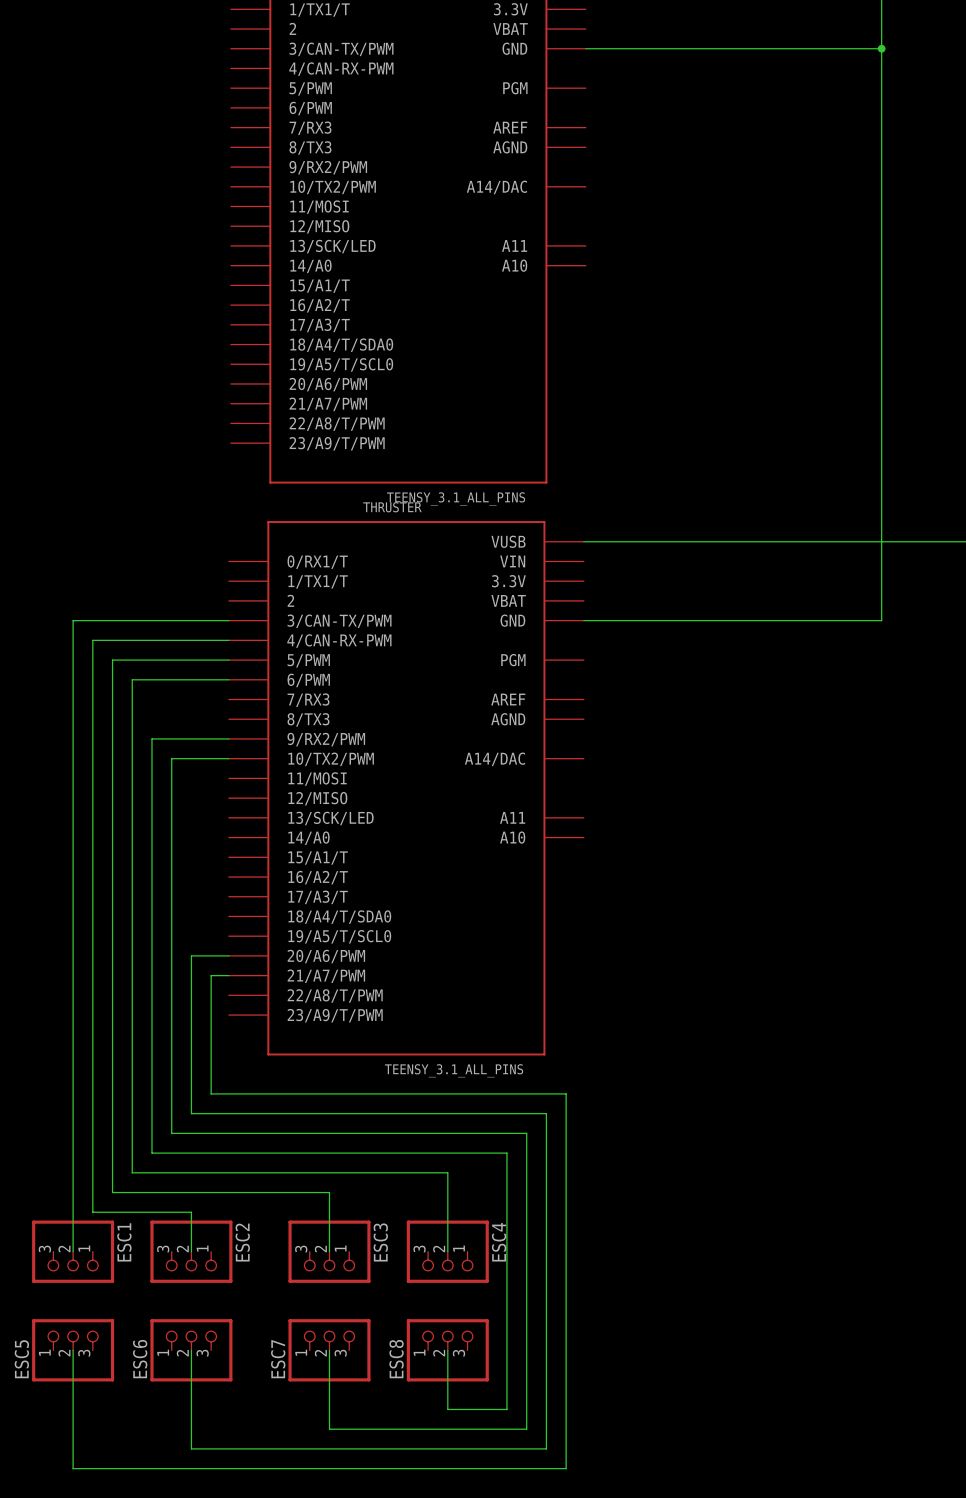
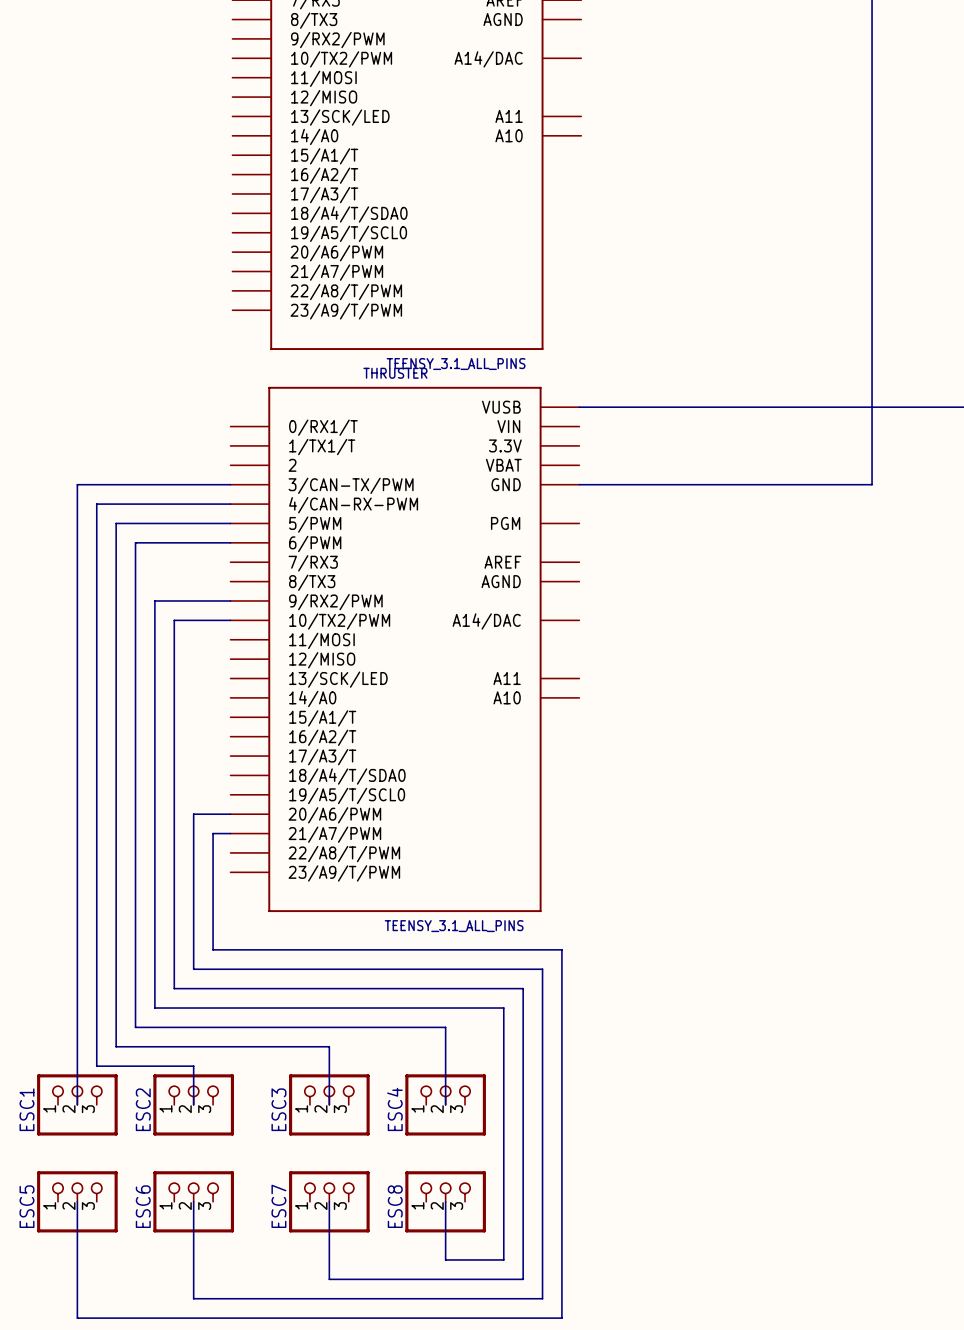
ESC1 rotation: 0° (73, 1251) -> 180° (77, 1104)
ESC2 rotation: 0° (191, 1251) -> 180° (193, 1104)
ESC3 rotation: 0° (329, 1251) -> 180° (329, 1104)
ESC4 rotation: 0° (447, 1251) -> 180° (445, 1104)

